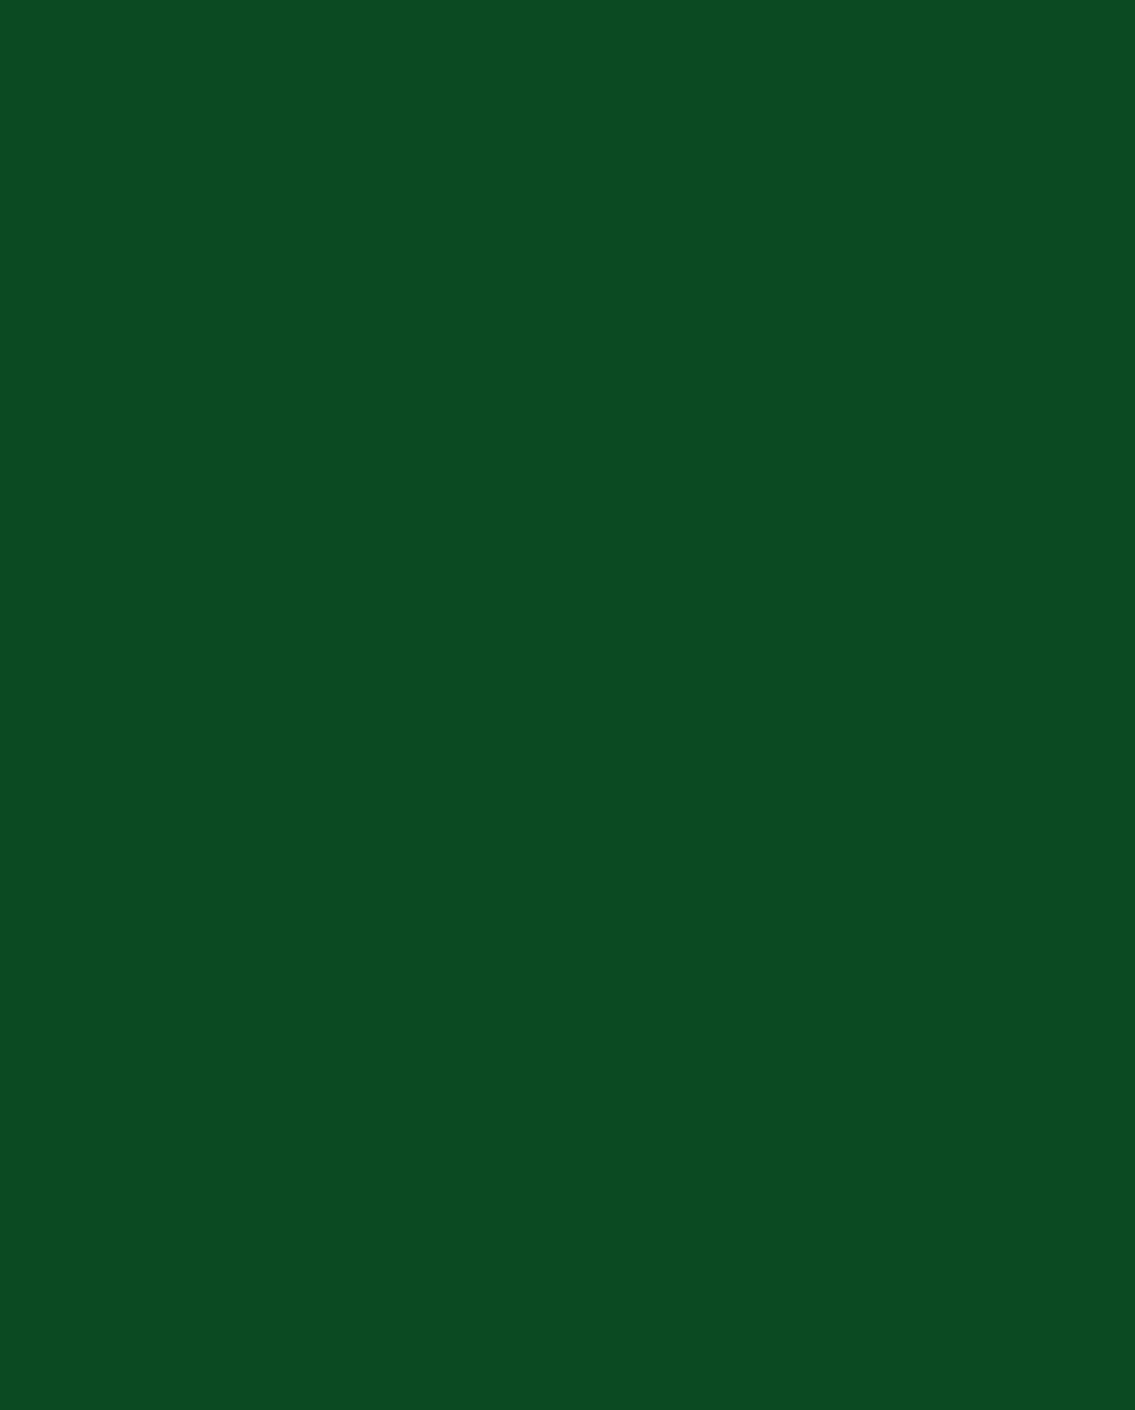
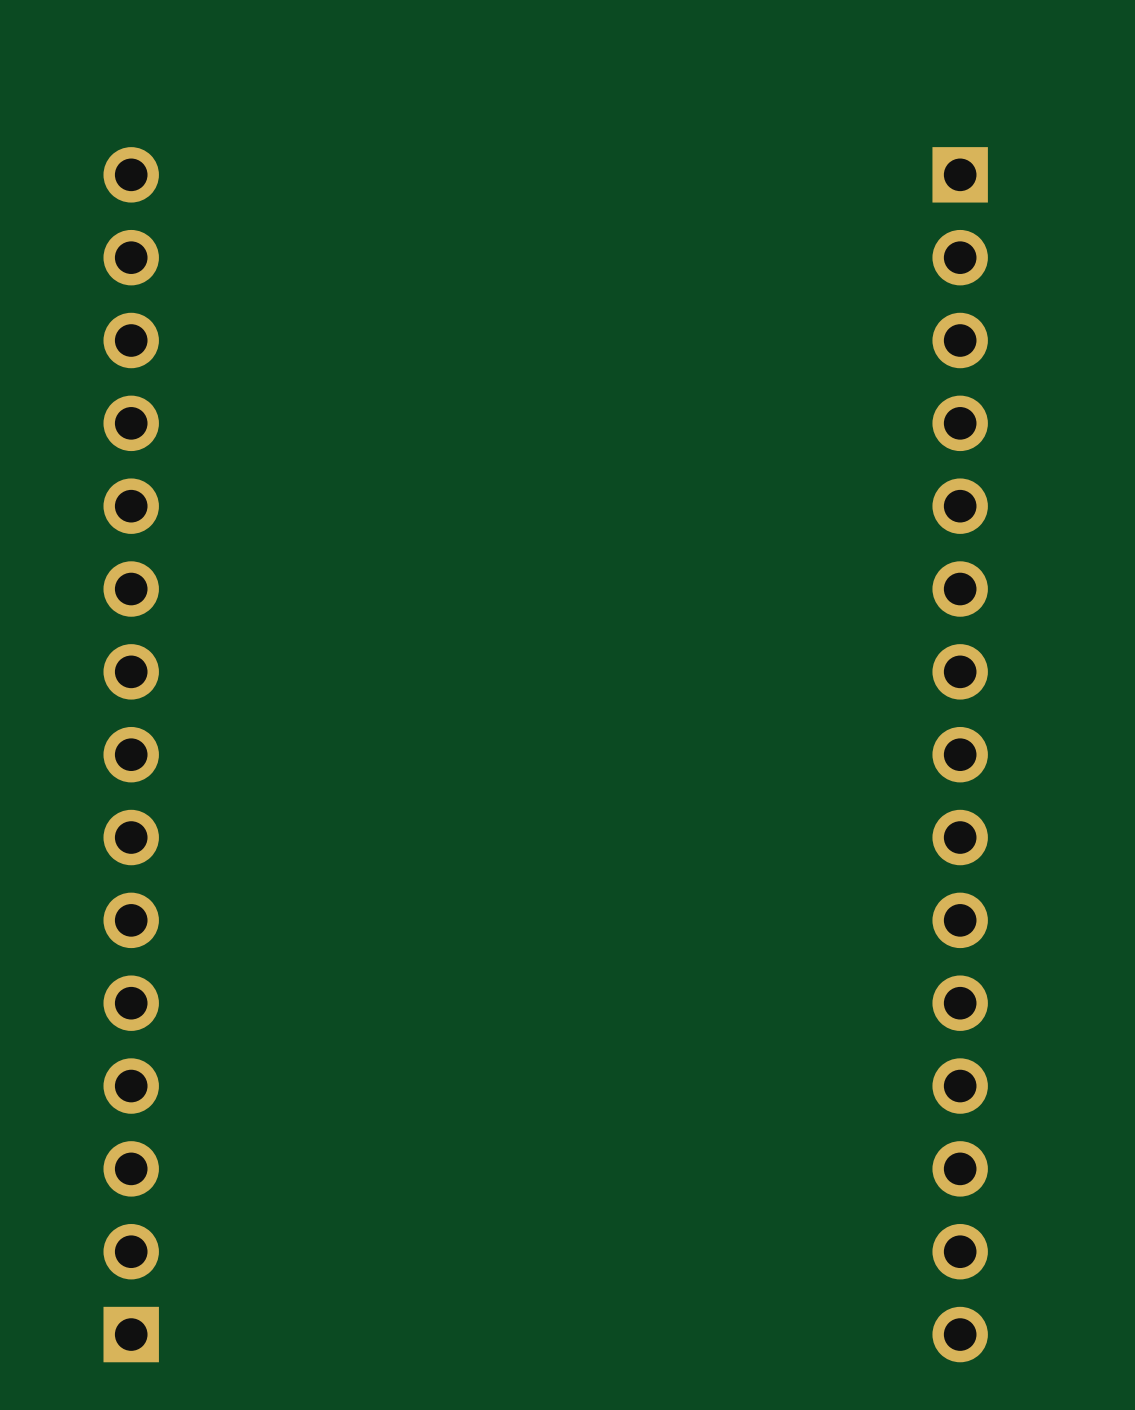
part: none -> (131, 754)
part: none -> (960, 754)

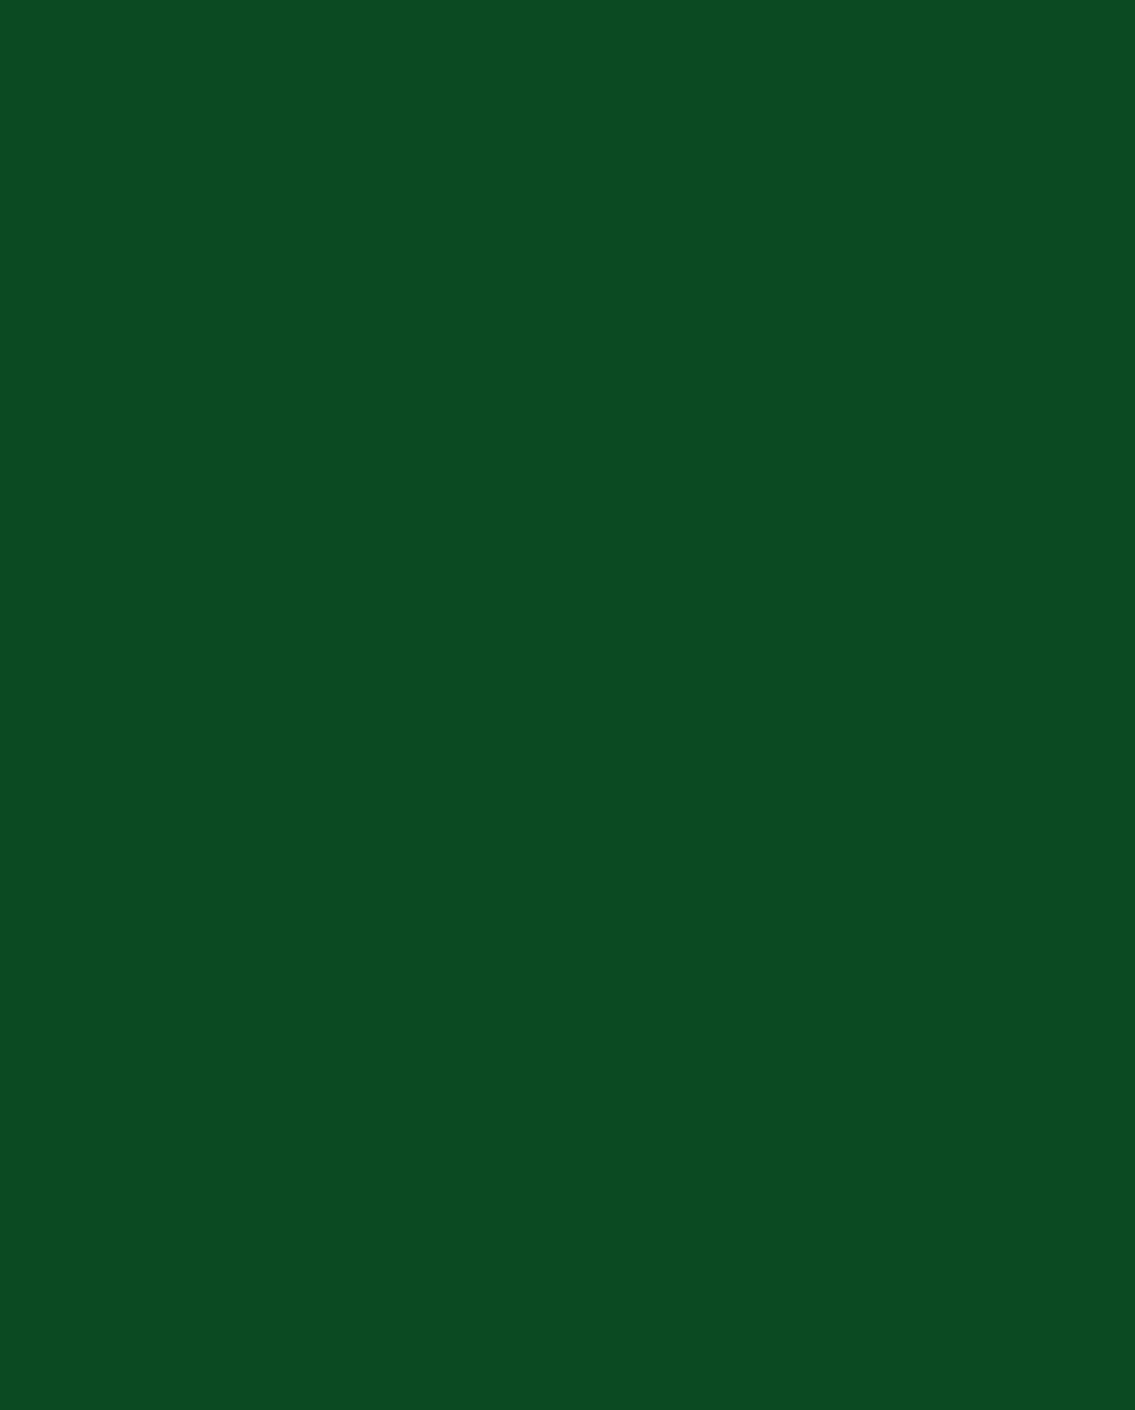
part: (131, 754) -> none
part: (960, 754) -> none

